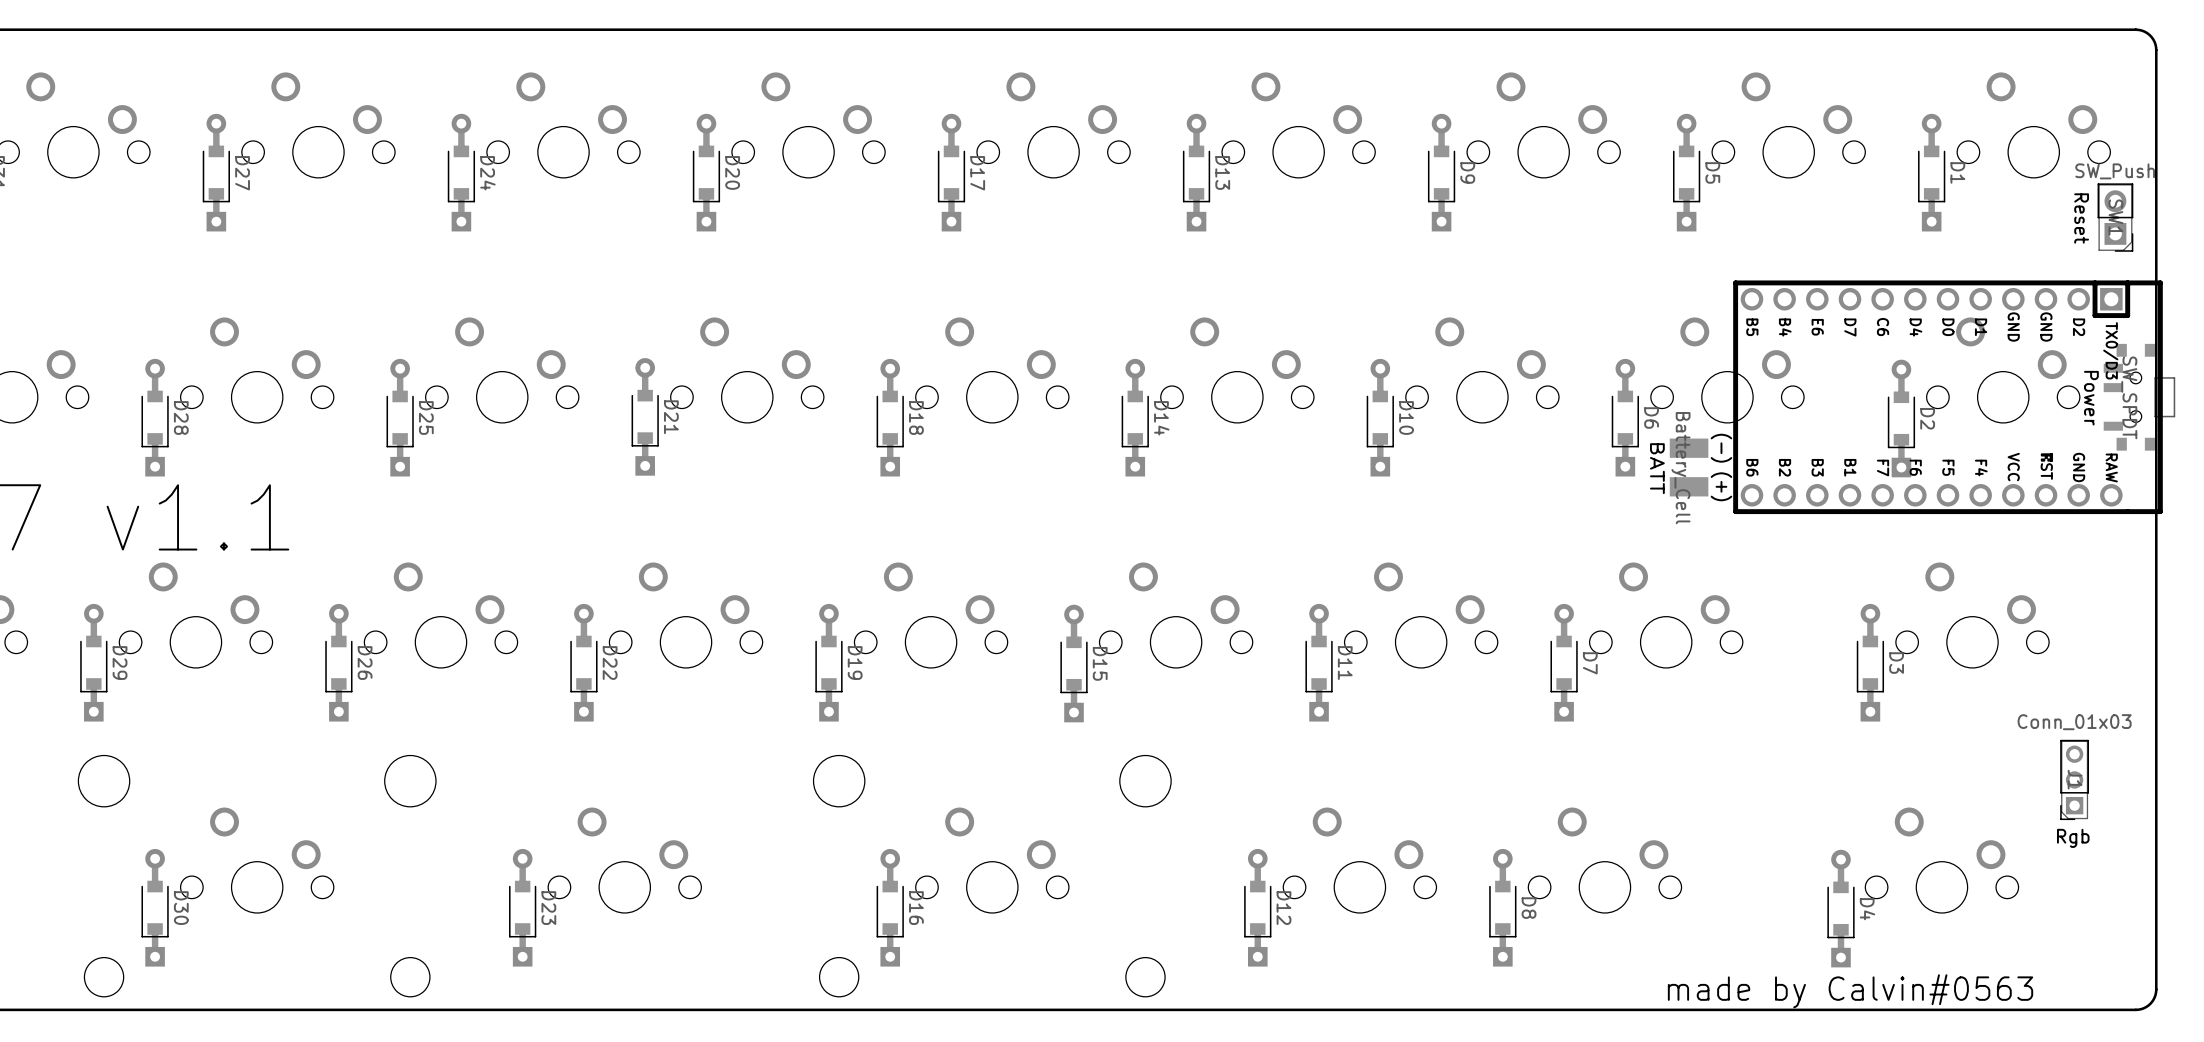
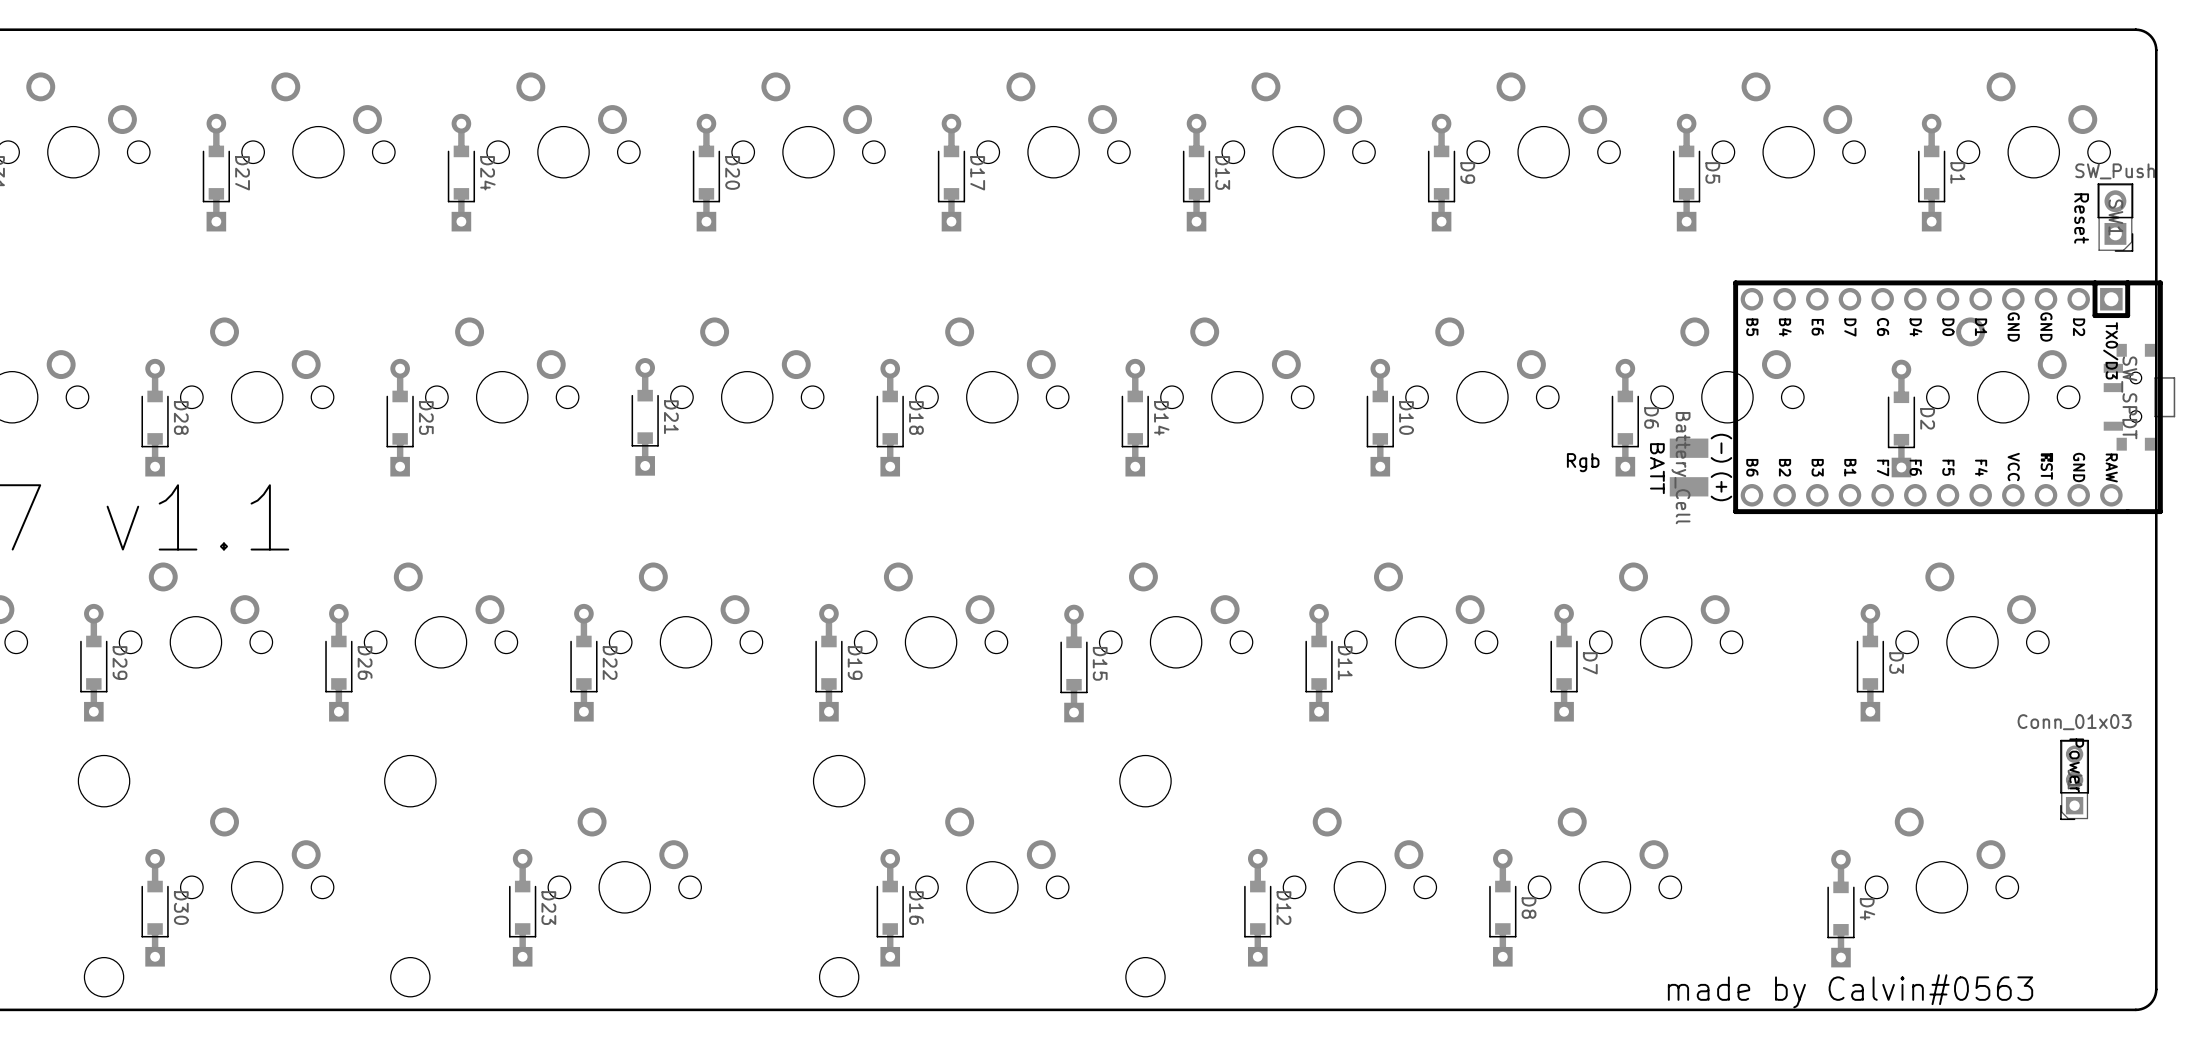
text: Power (2091, 398) -> none
text: none -> Rgb (1583, 462)
text: none -> Power (2076, 765)
text: Rgb (2073, 838) -> none

